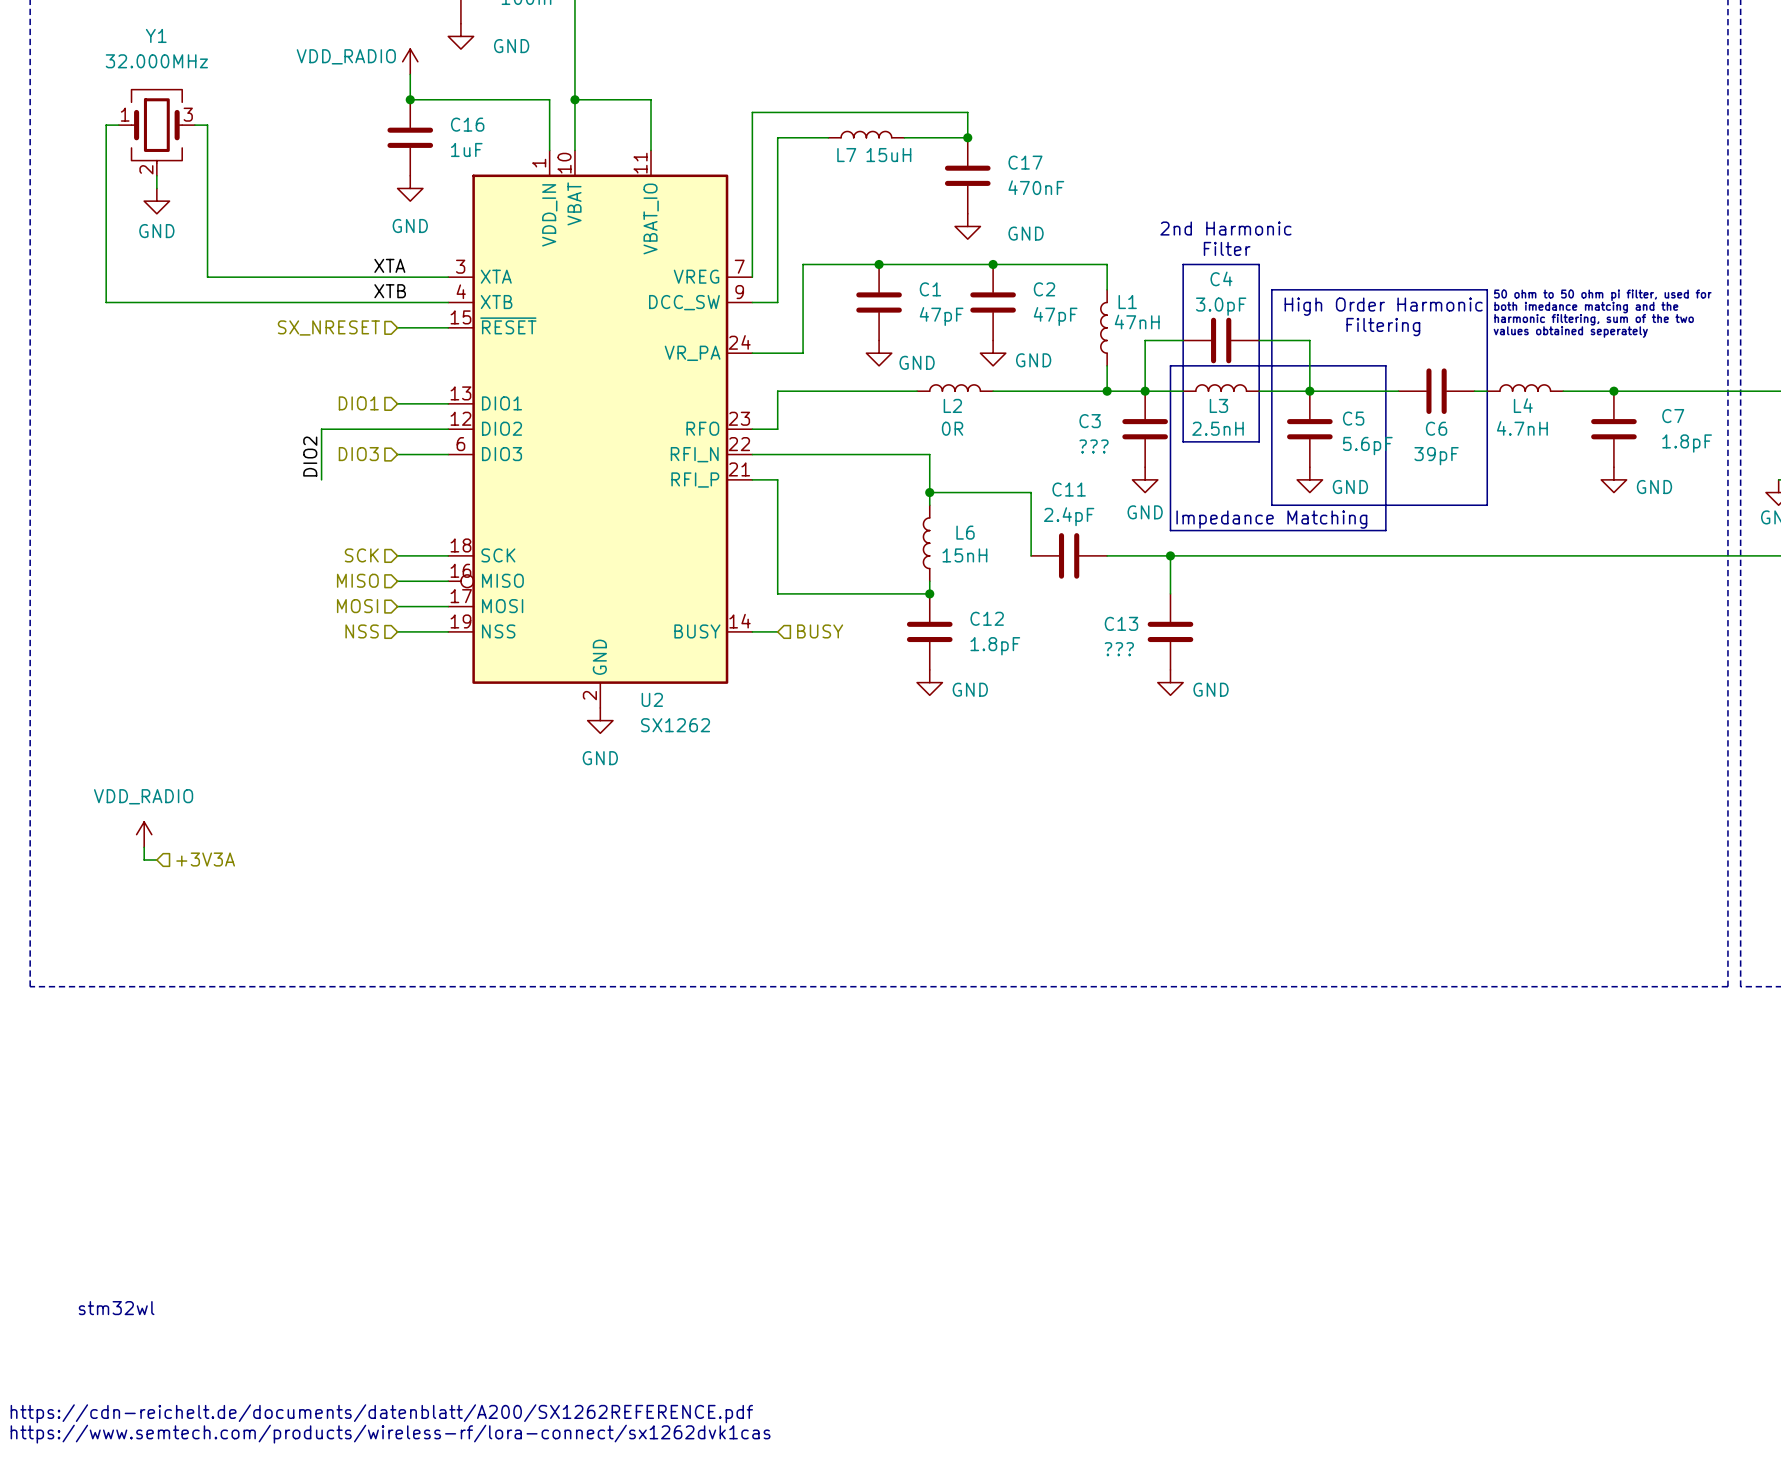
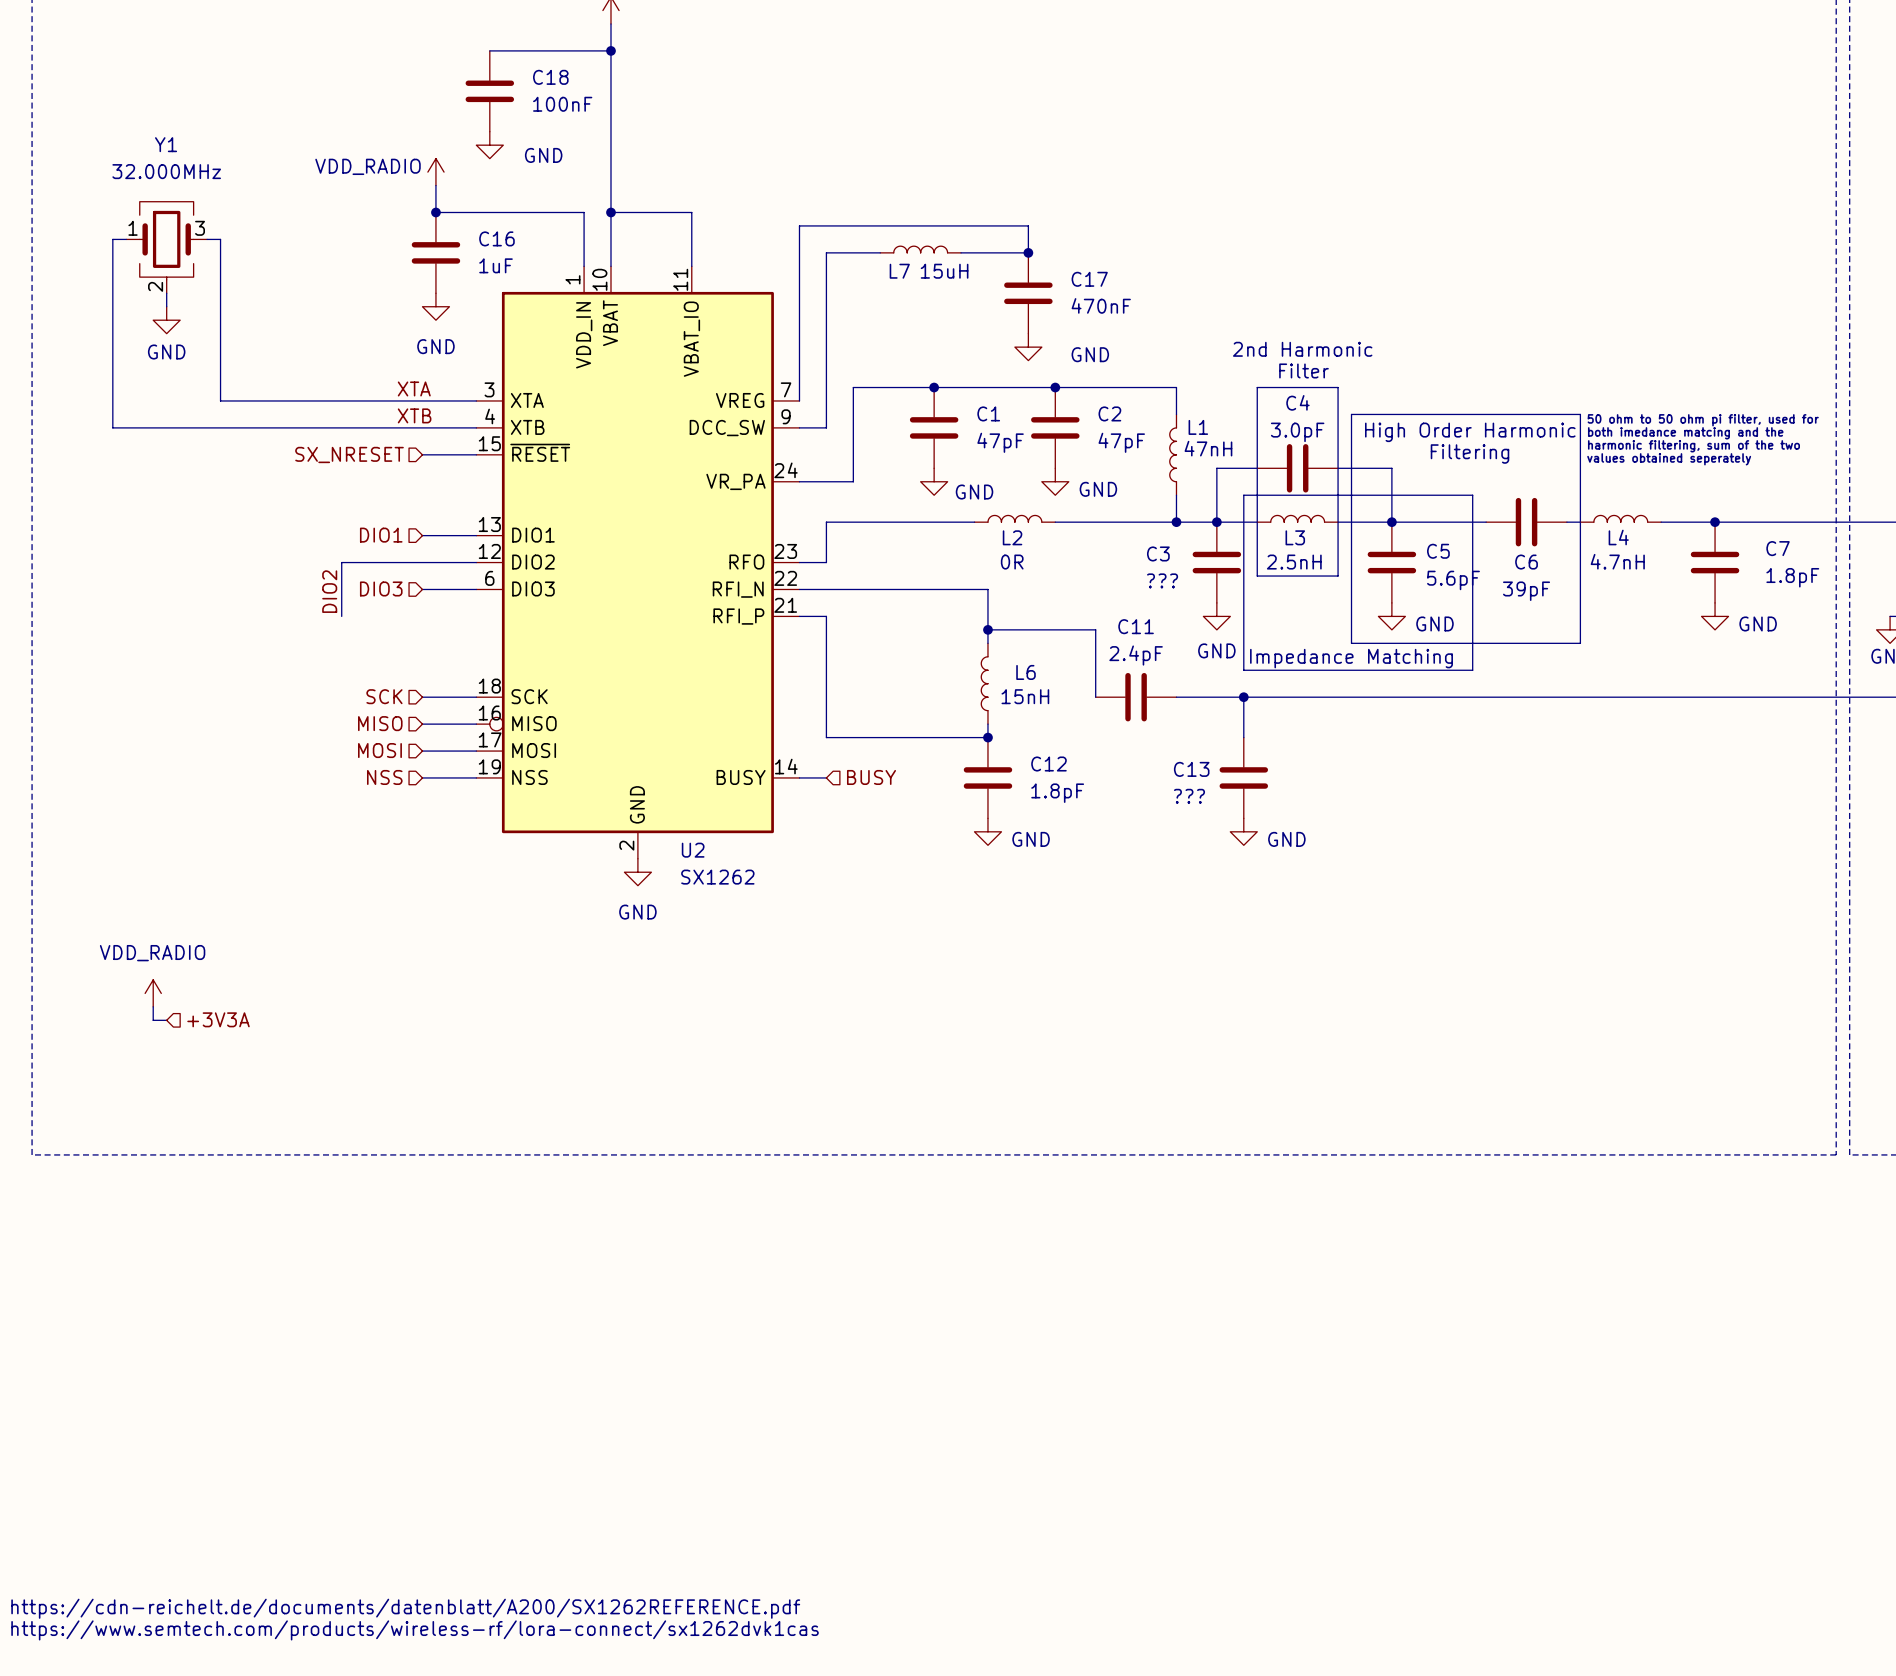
text: stm32wl (116, 1308) -> none

